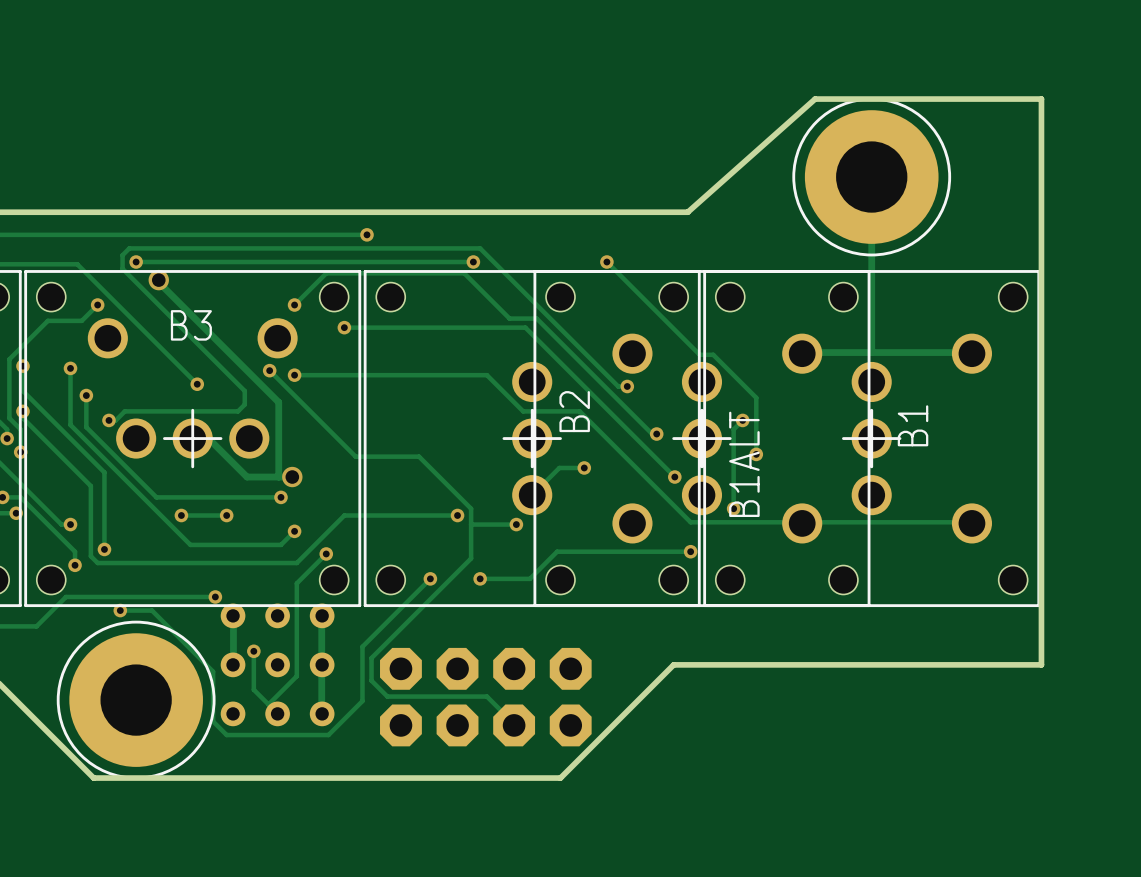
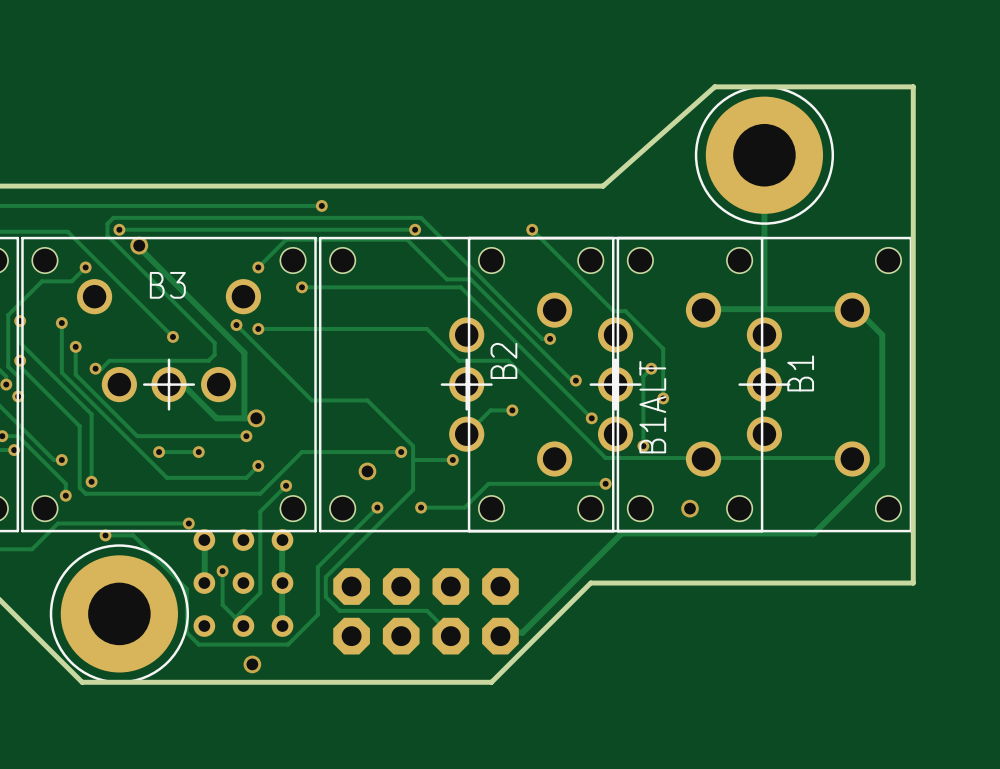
track: none -> (852, 310) (857, 310) (882, 334) (882, 465) (814, 533) (621, 533) (522, 632) (503, 632) (500, 636)
via: none -> (367, 471)
via: none -> (690, 508)
via: none -> (252, 664)

